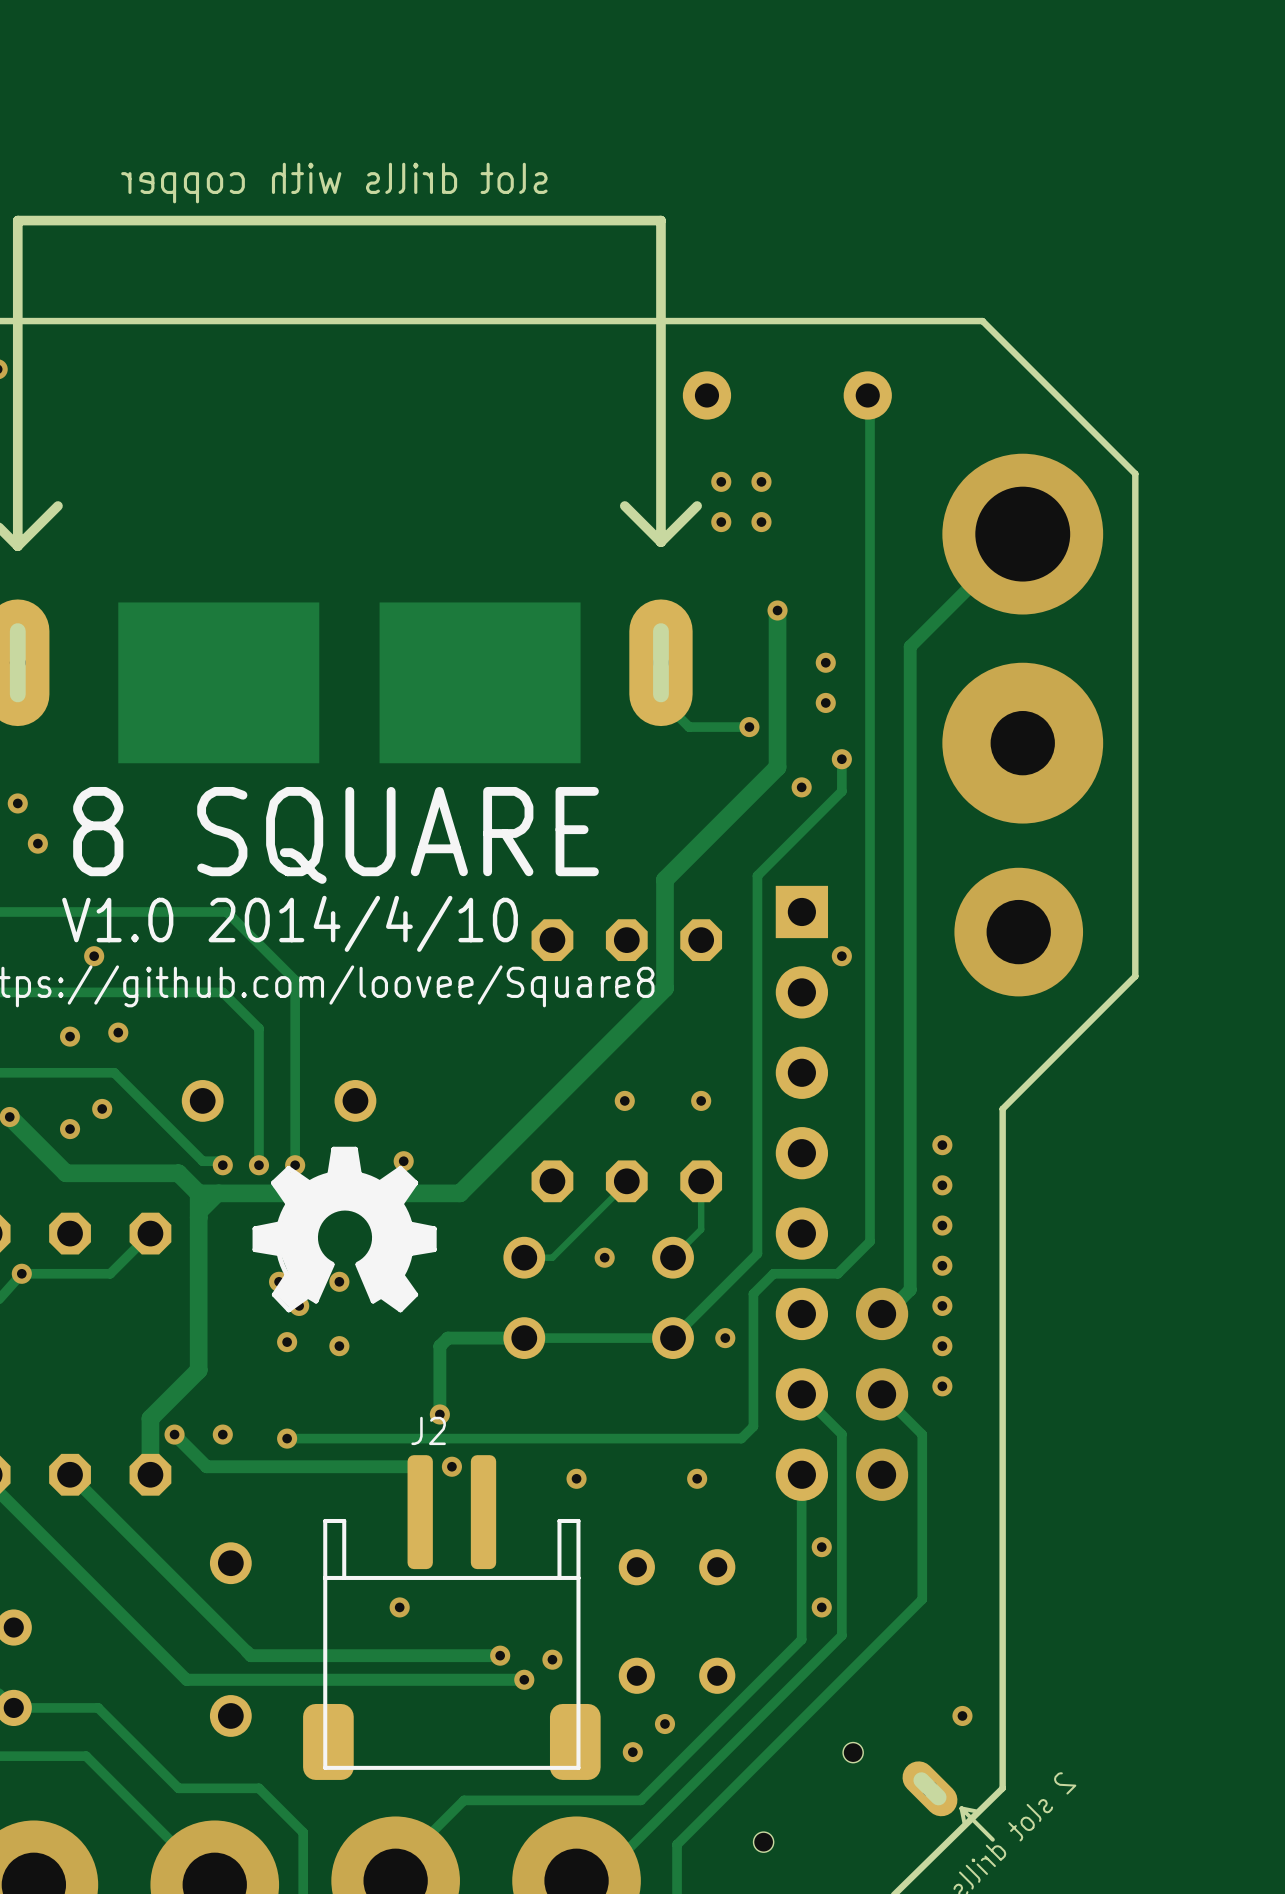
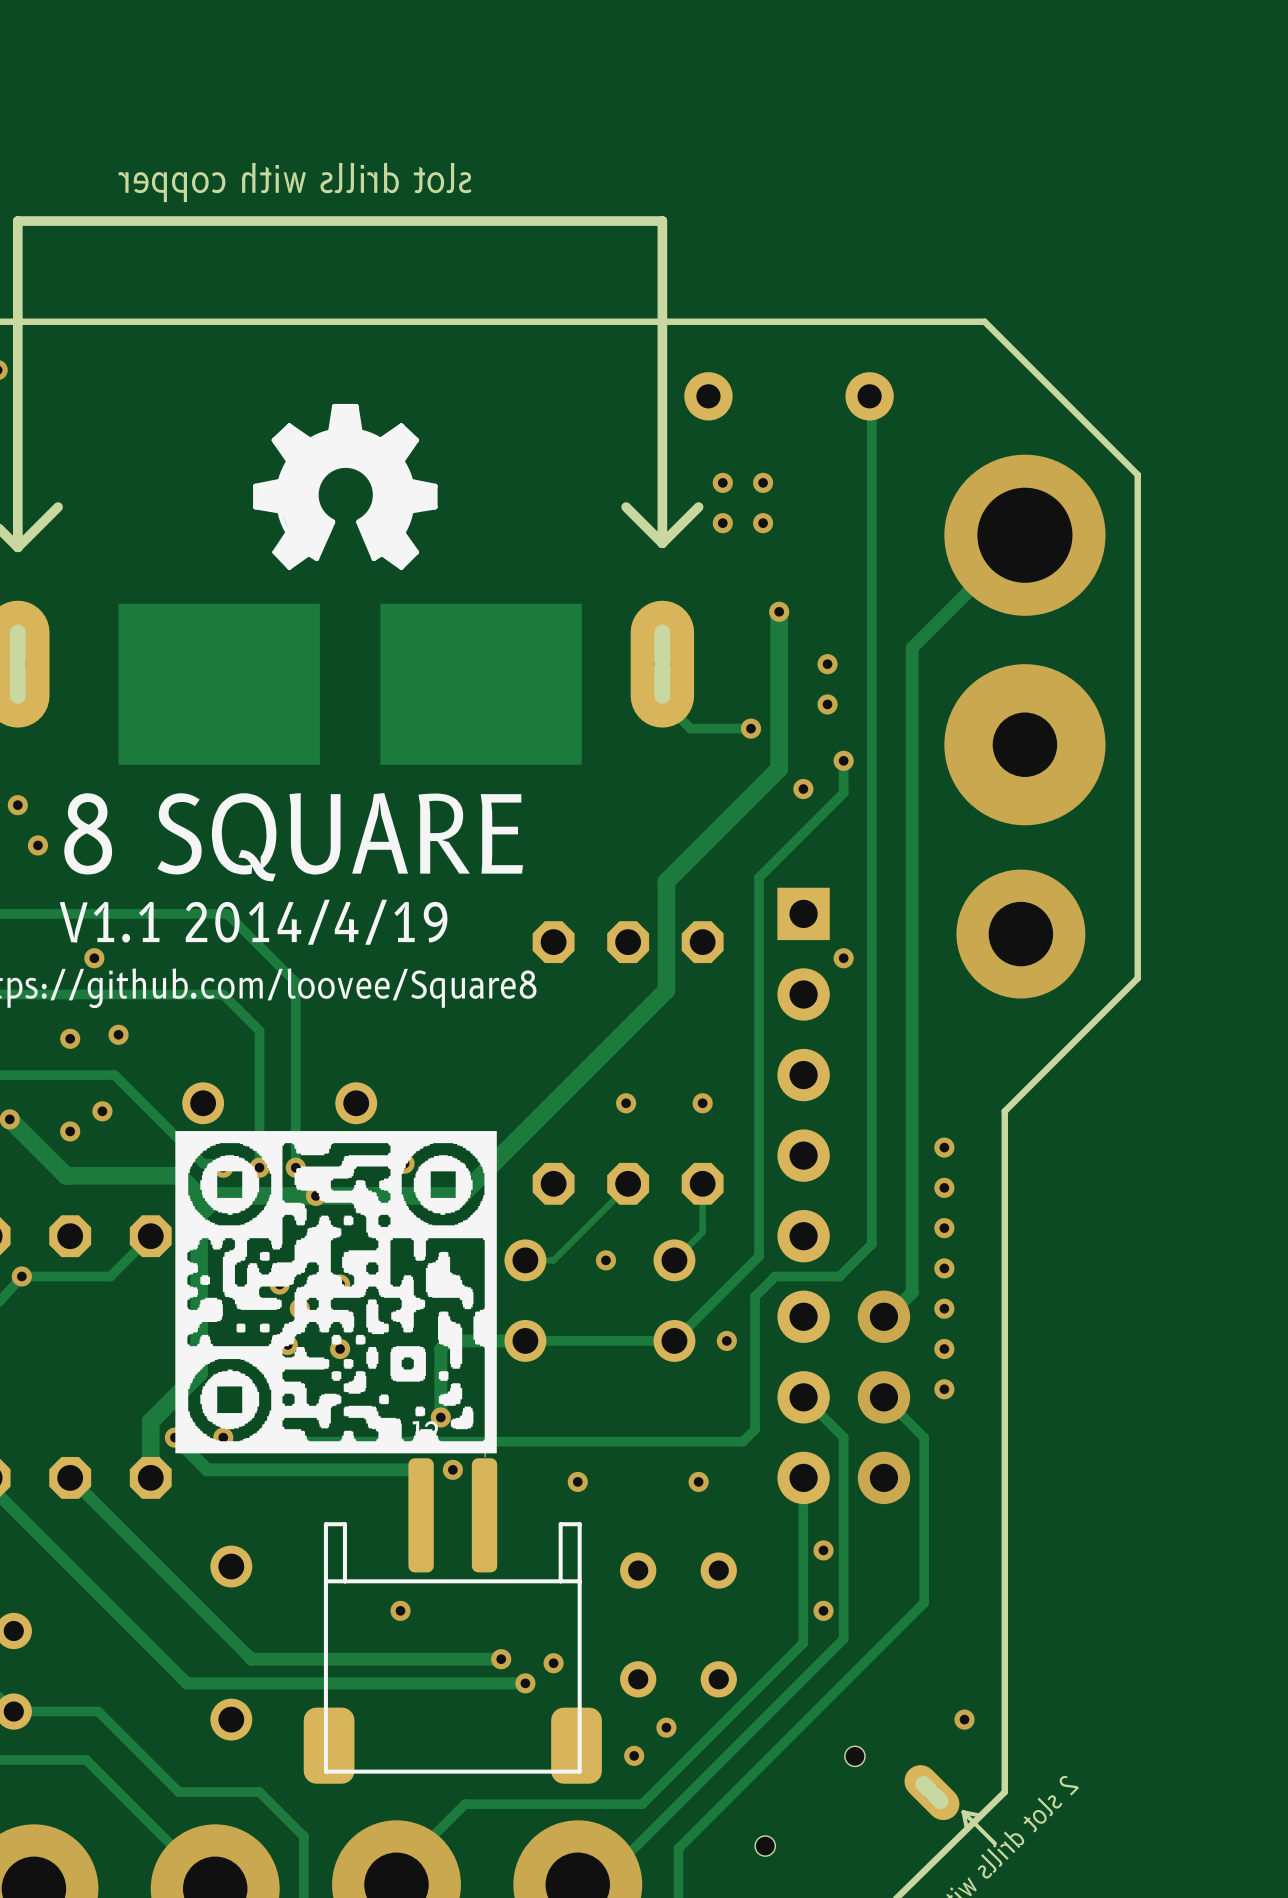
text: V1.0 2014/4/10 (290, 923) -> V1.1 2014/4/19 (253, 922)
drawing: none -> [175, 1131, 497, 1458]
drawing position: (344, 1229) -> (345, 486)

